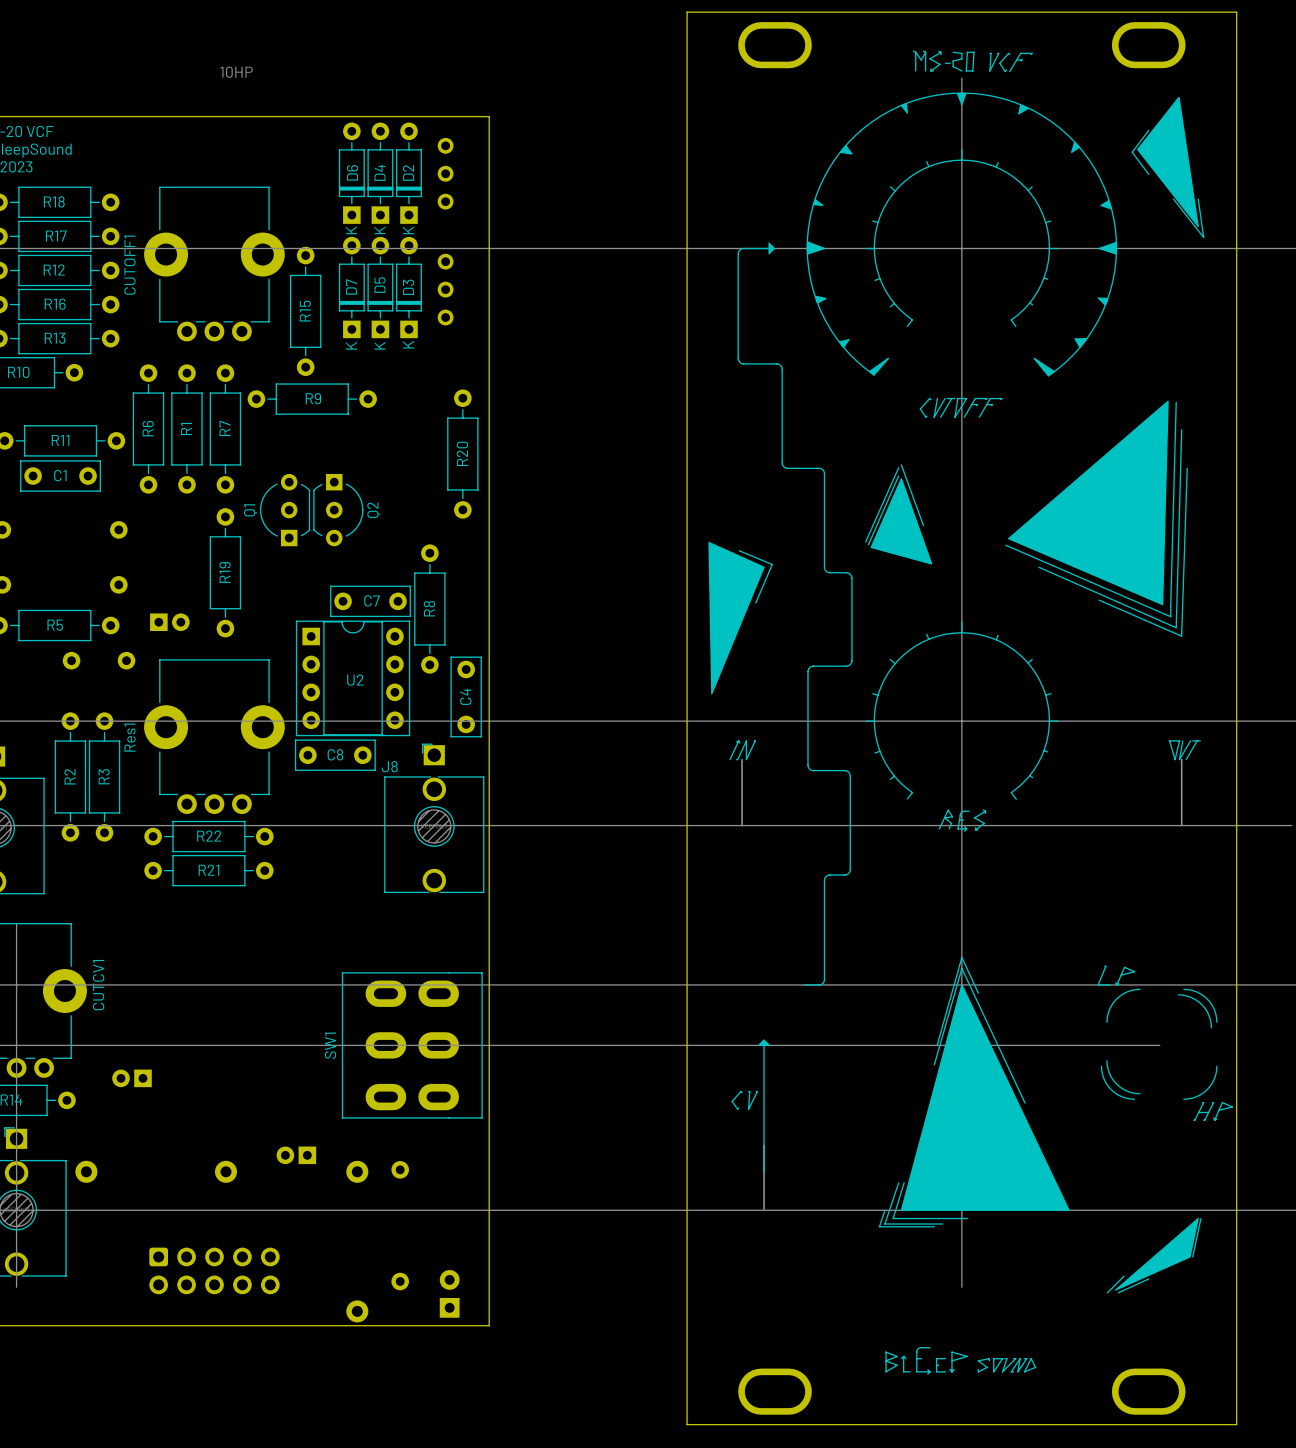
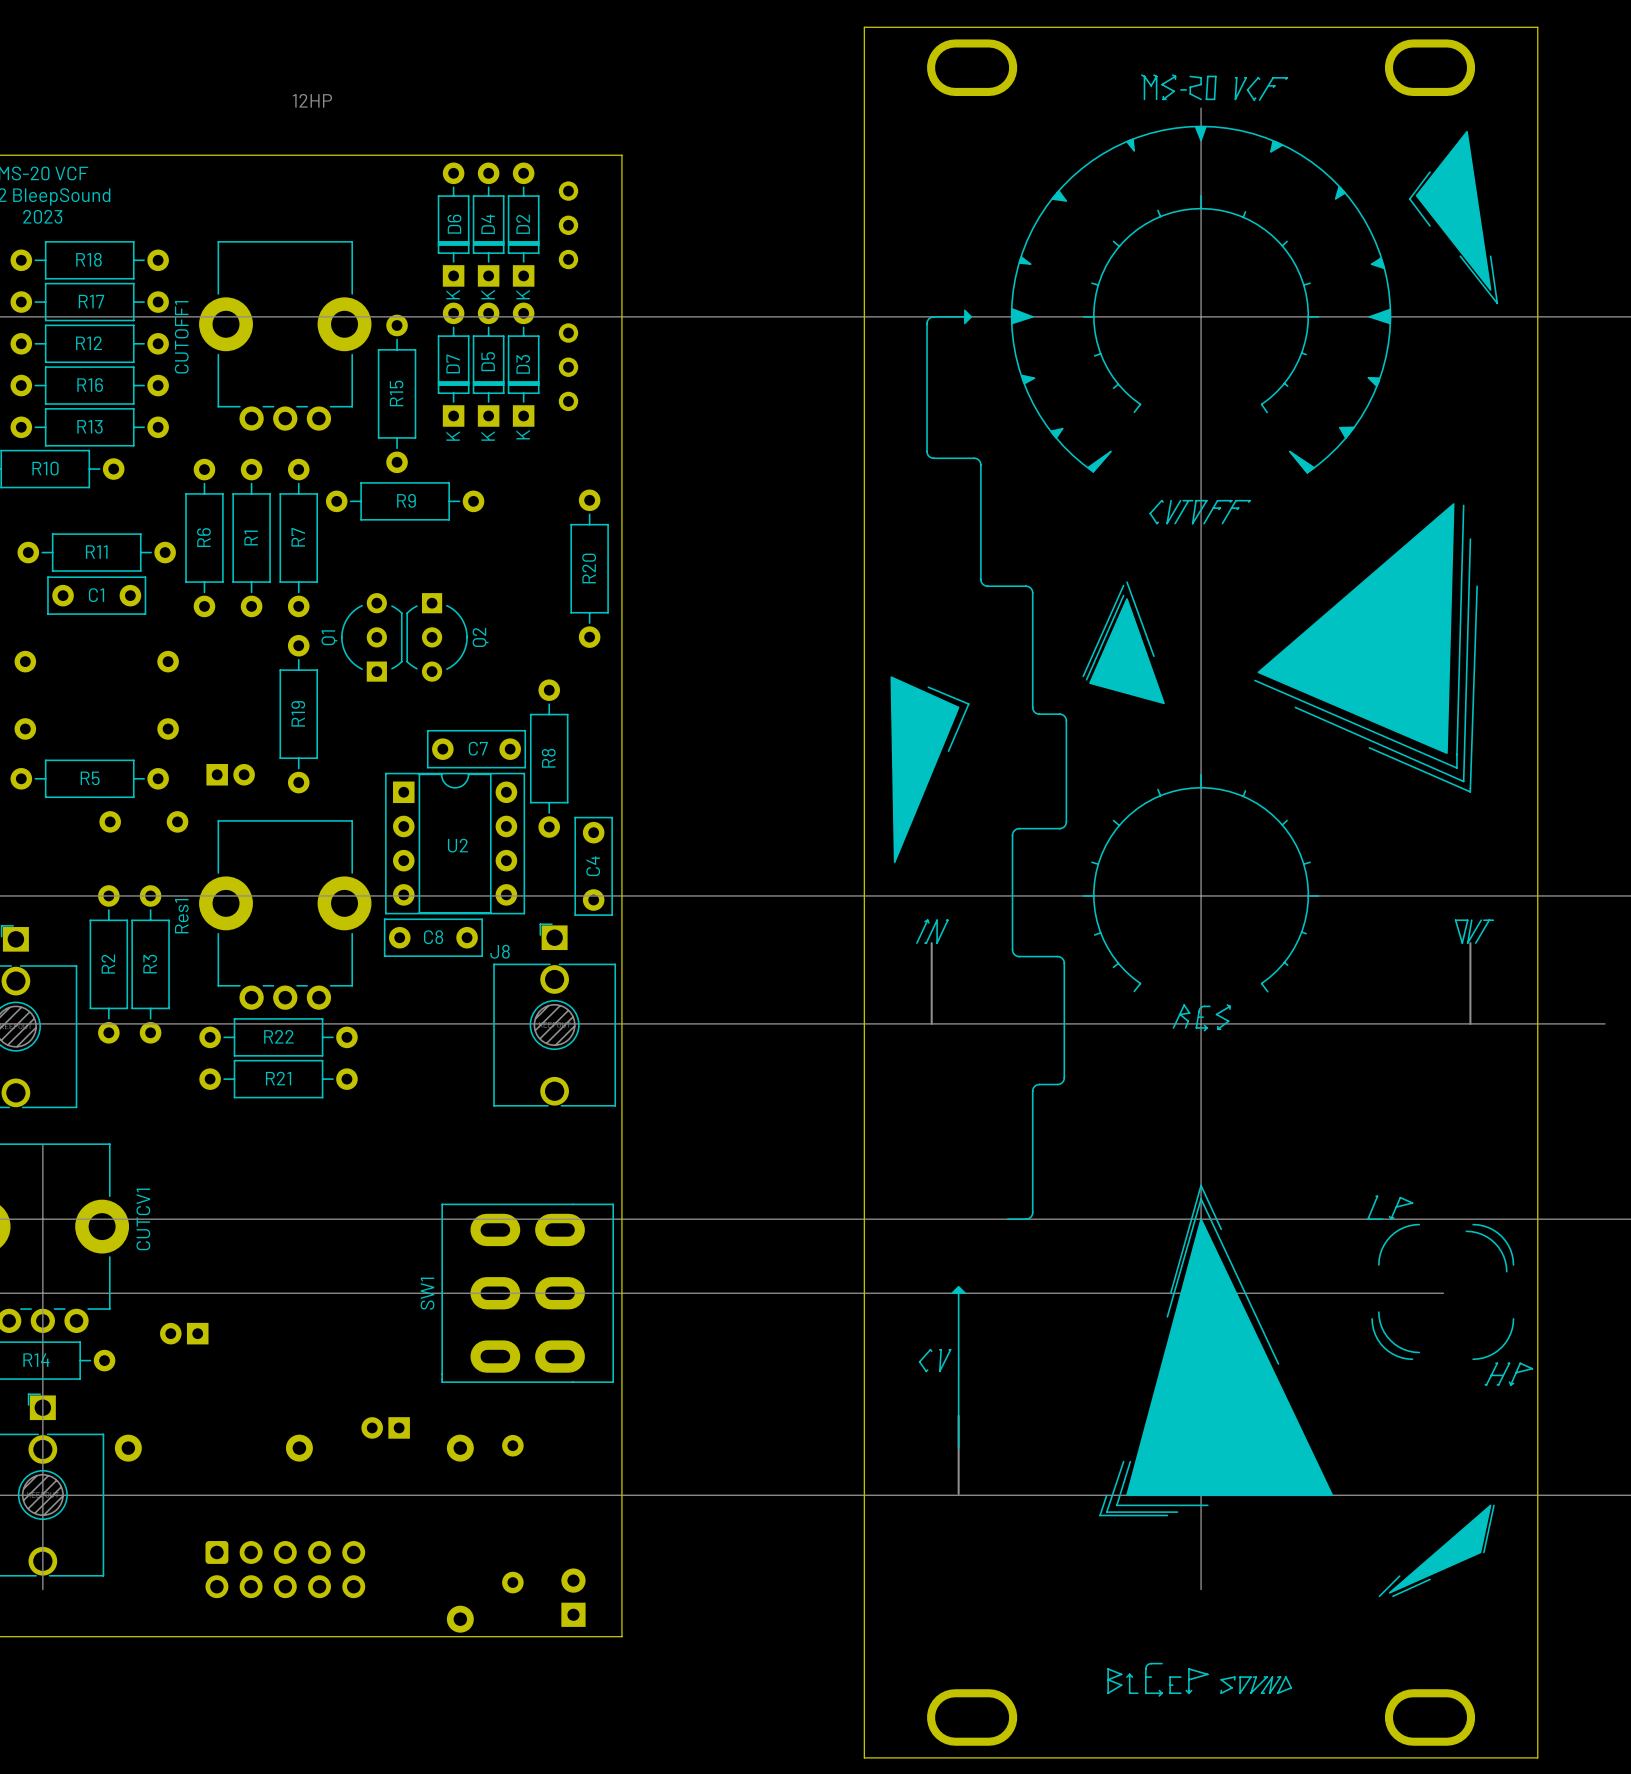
text: 10HP (236, 72) -> 12HP (312, 100)

